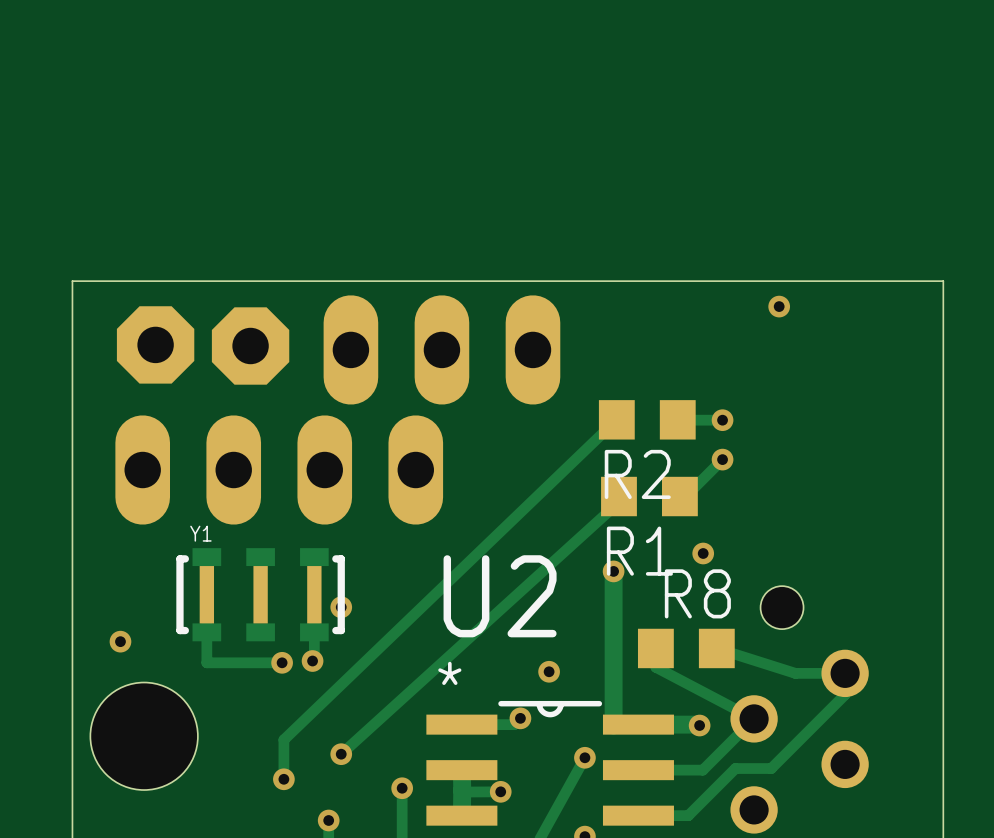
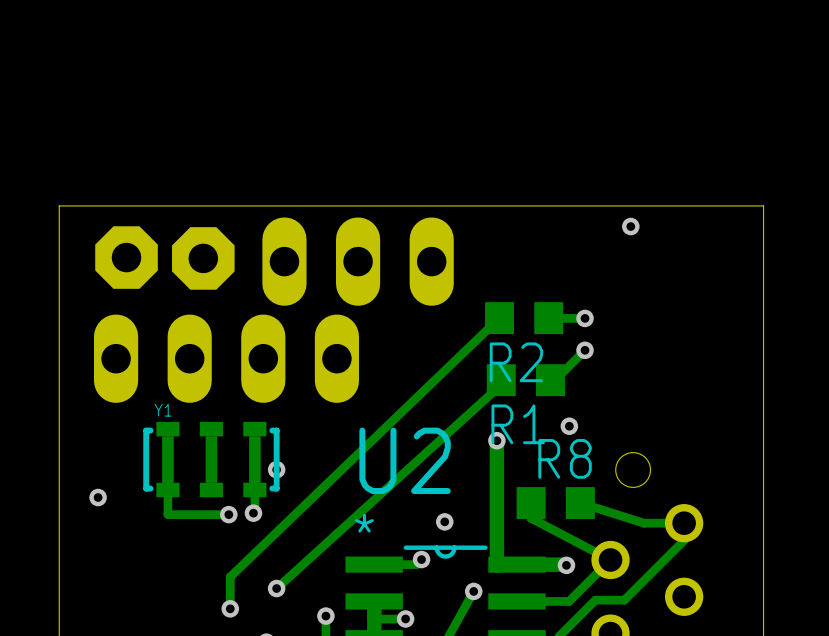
hole: (144, 736) -> none

